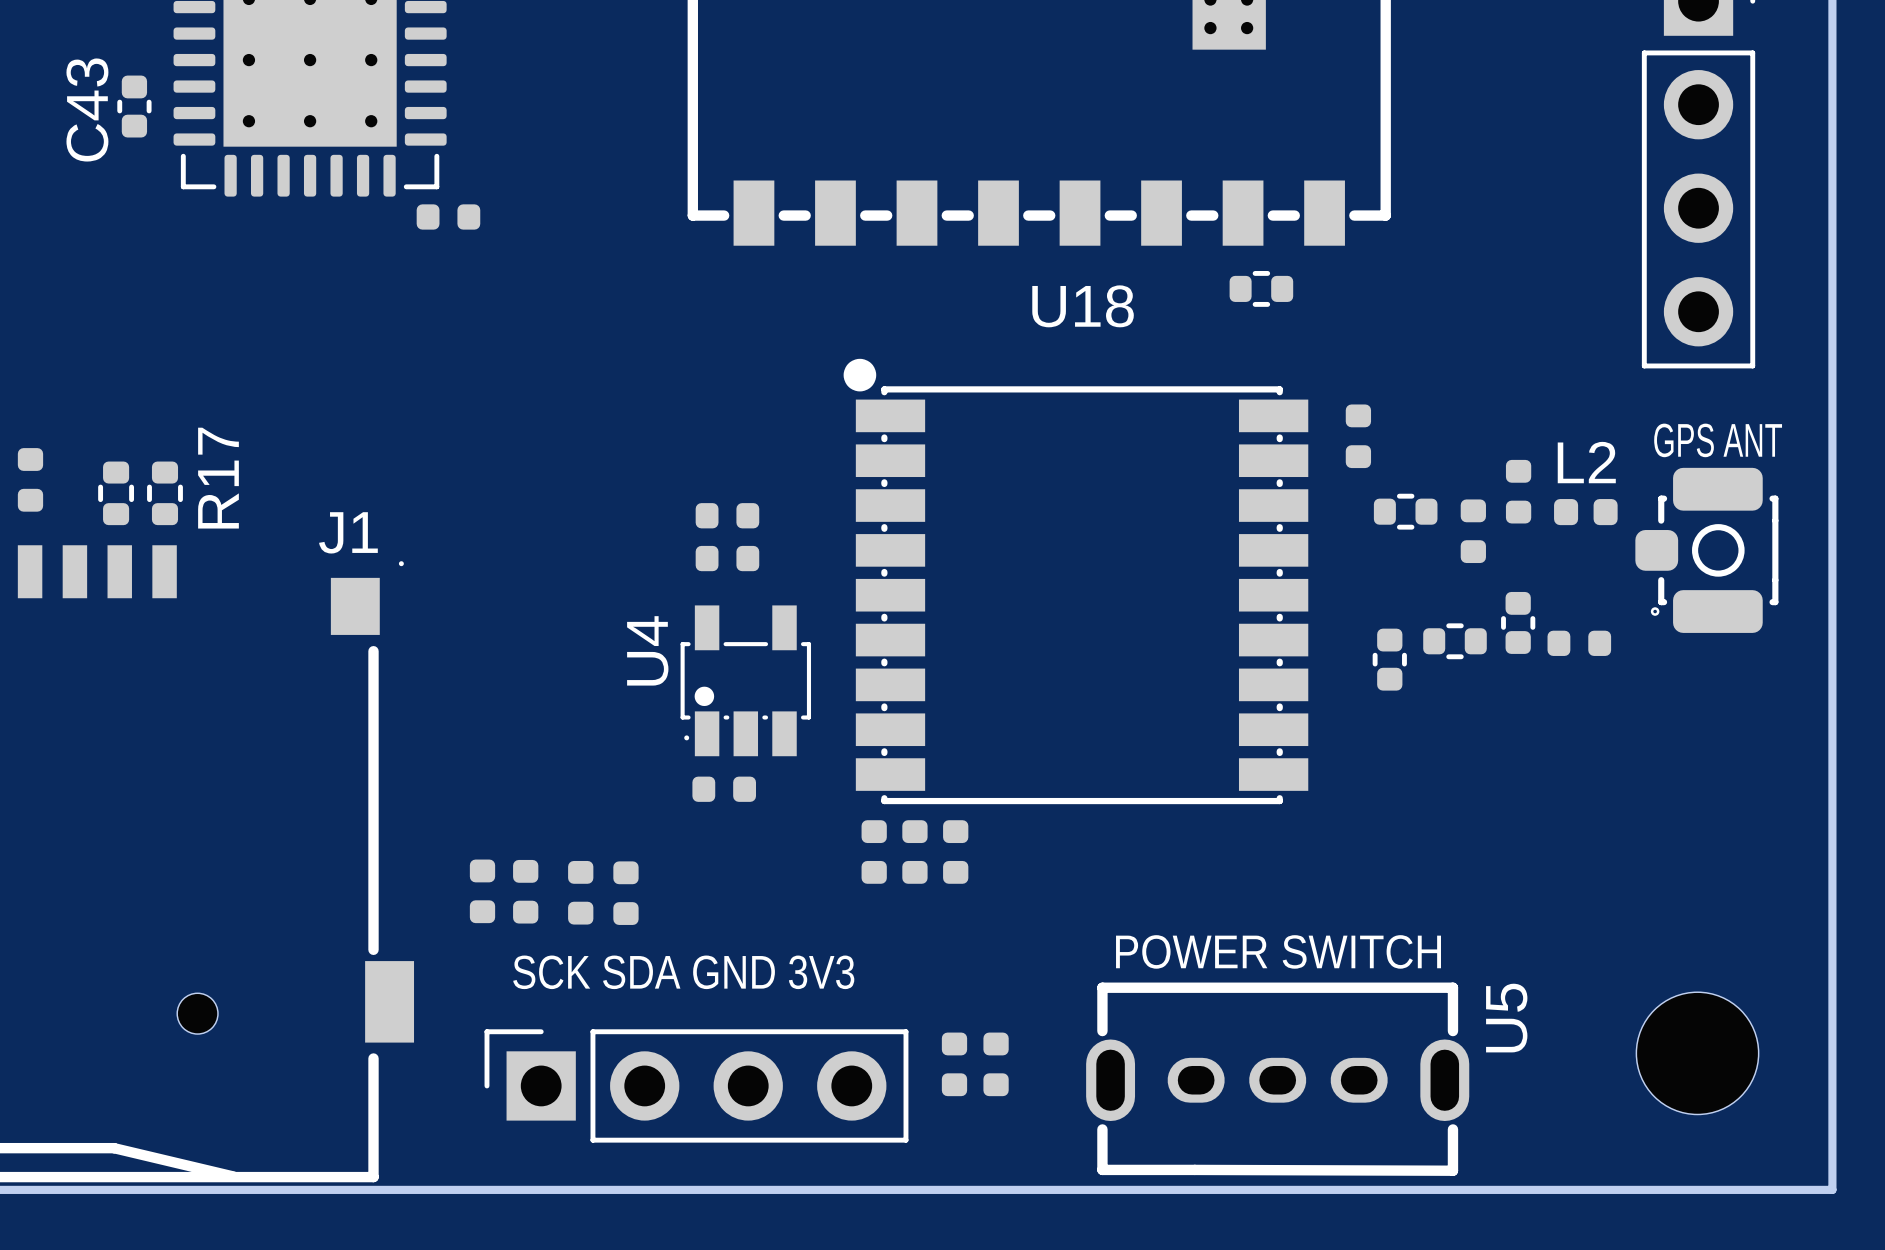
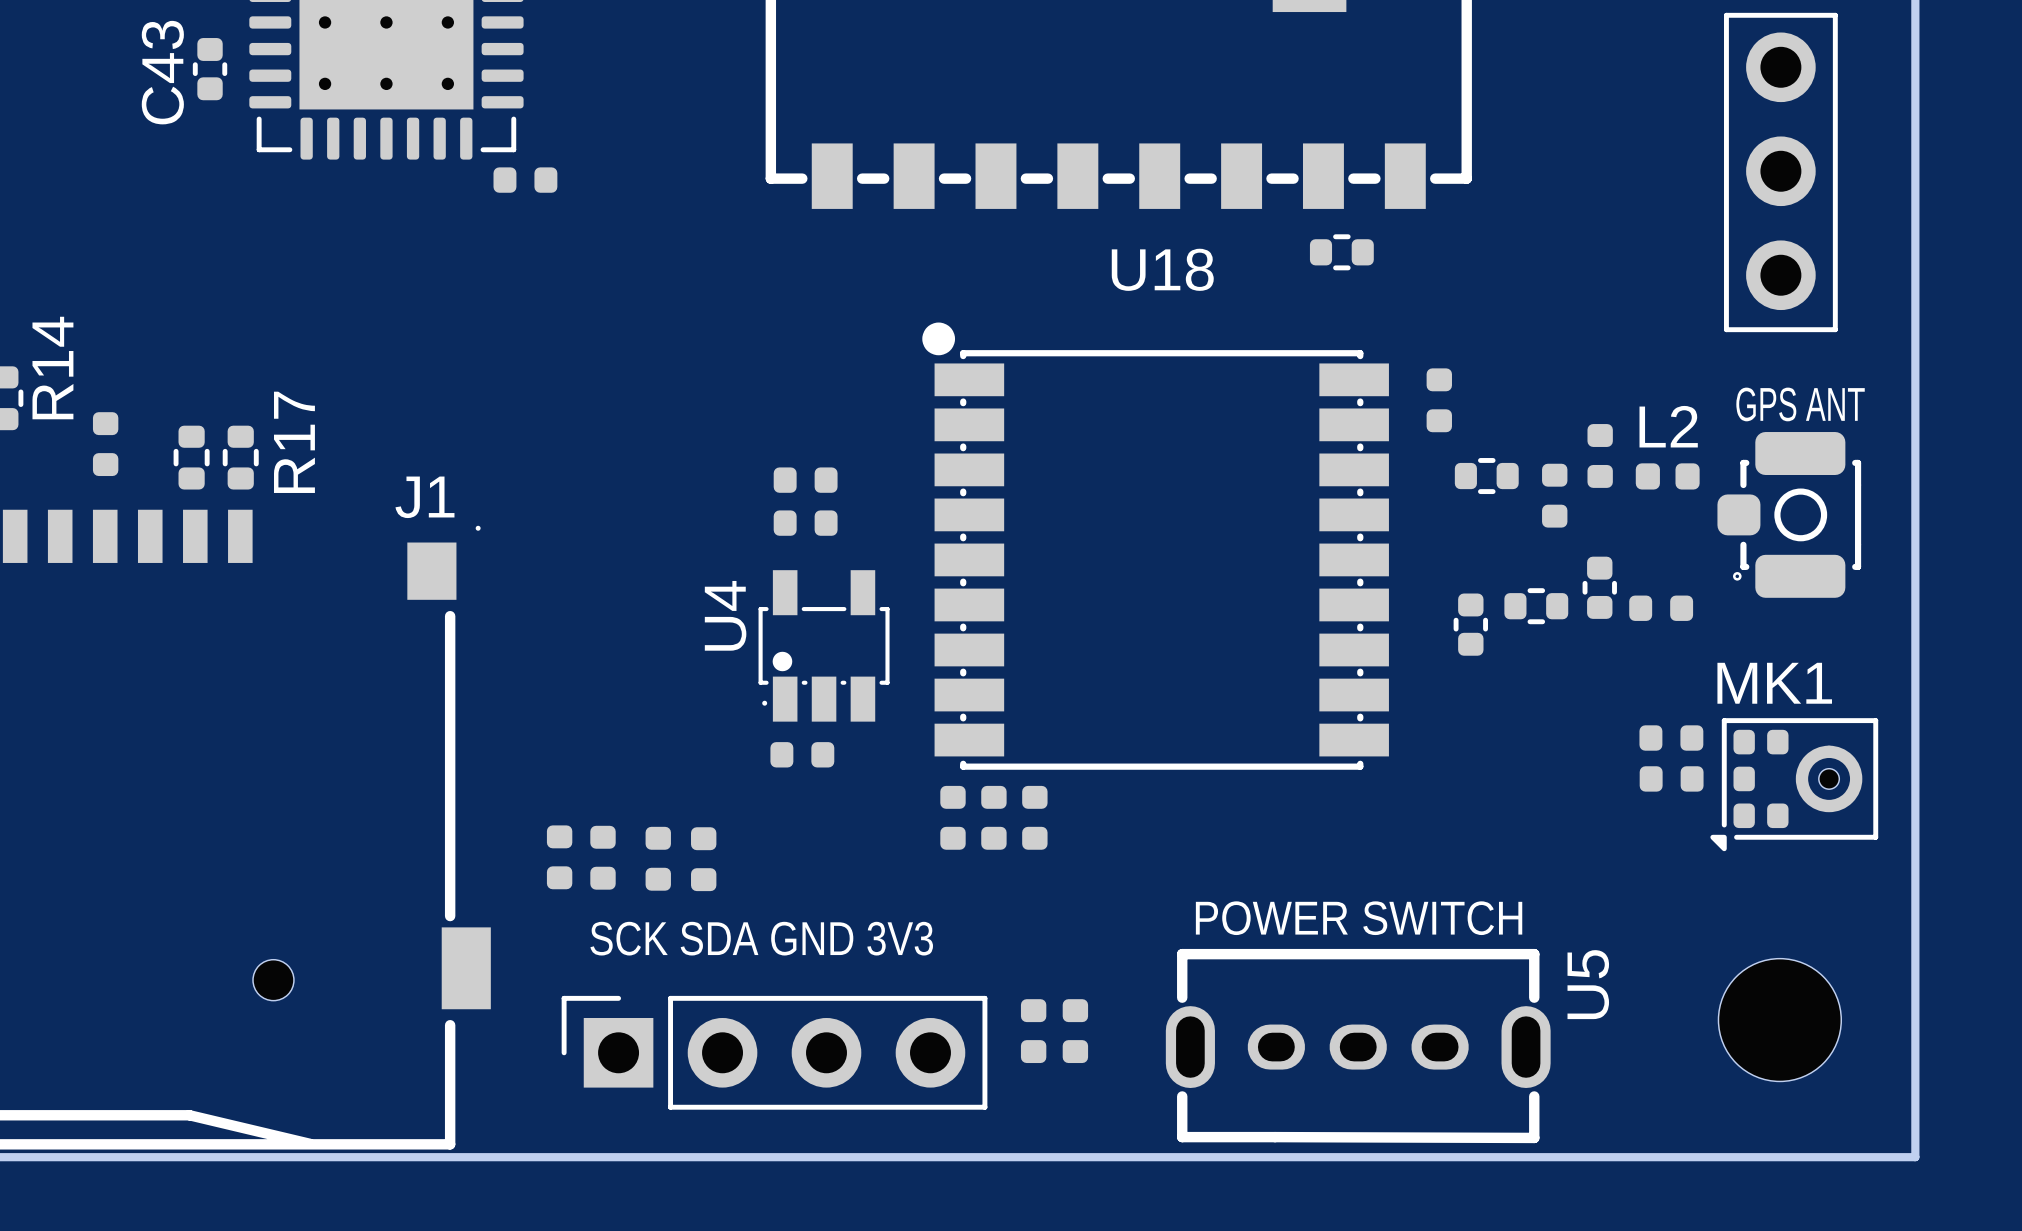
part: none -> (1671, 738)
part: none -> (1671, 778)
MK1: none -> (1794, 784)

